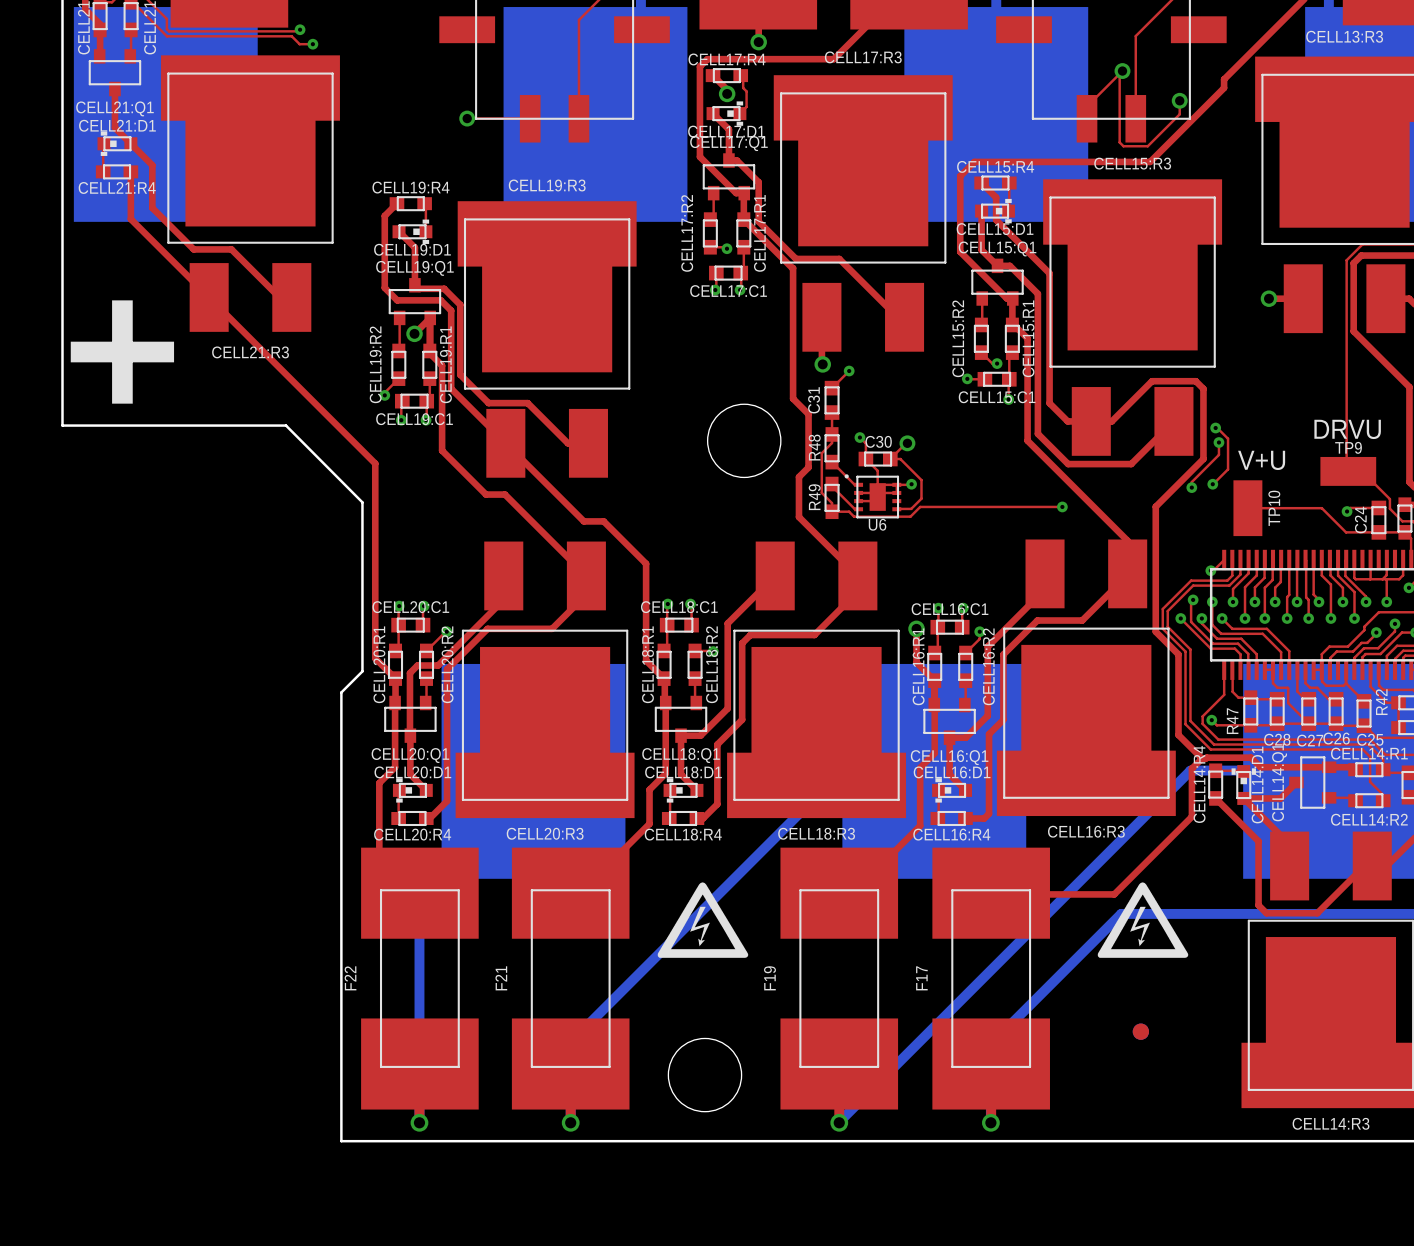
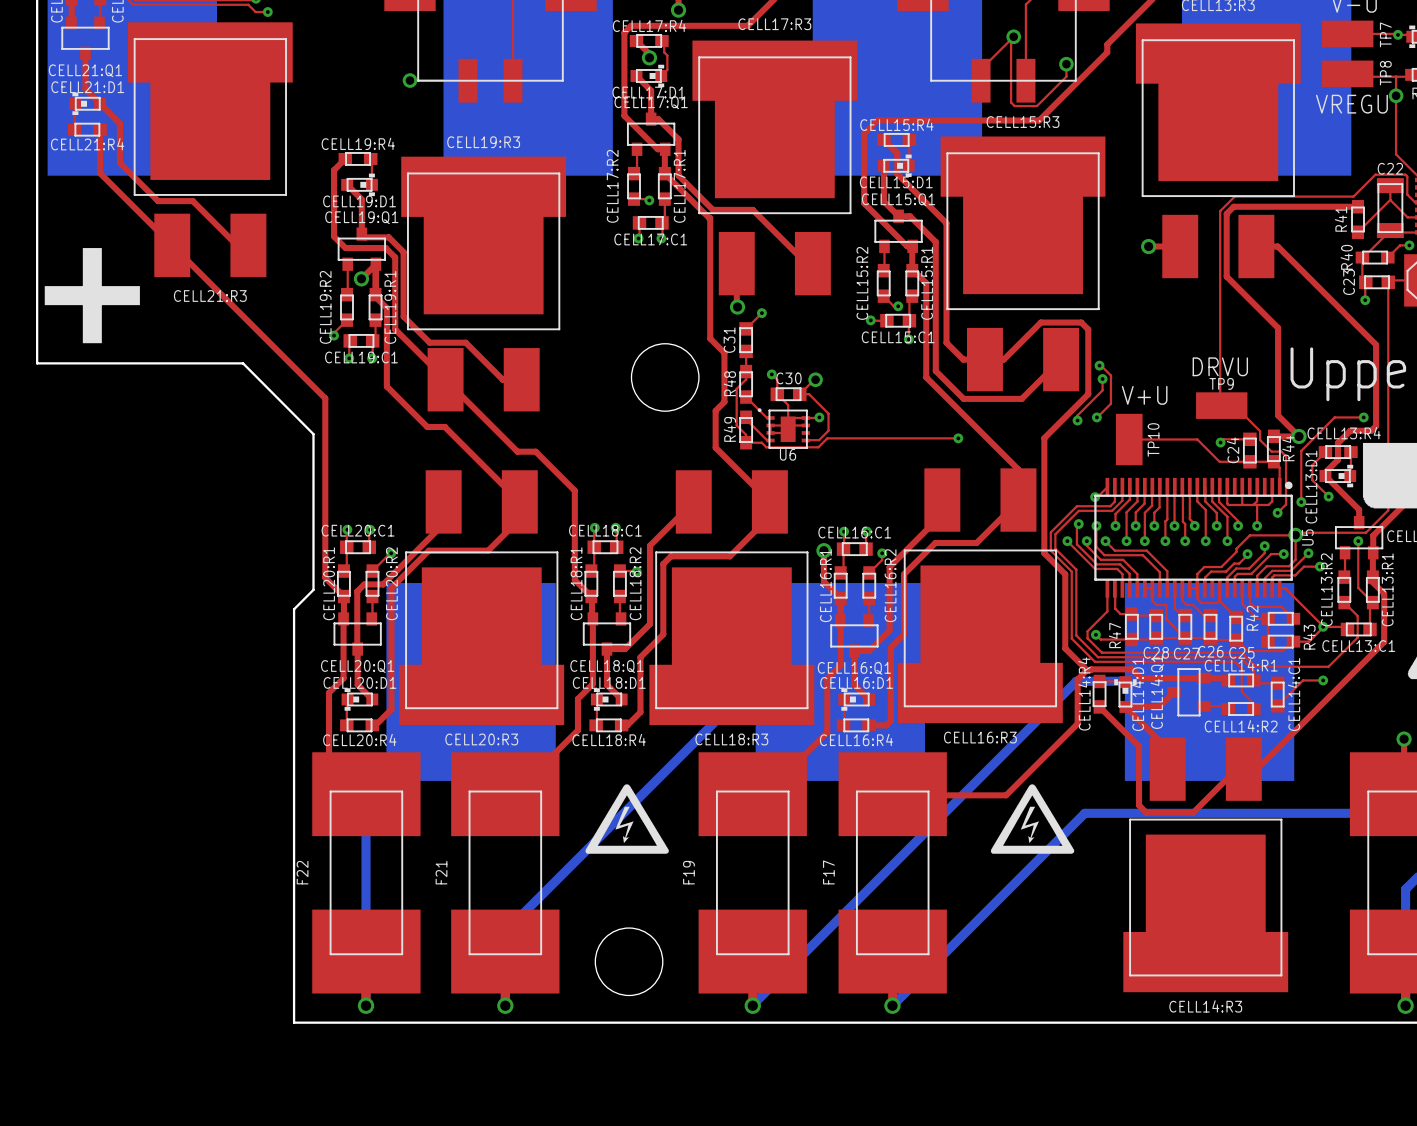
bottom track: (1199, 913) (1121, 913) (990, 1044) (990, 1122) -> (1084, 813) (892, 1005)
drawing: [1132, 1023, 1150, 1040] -> none

